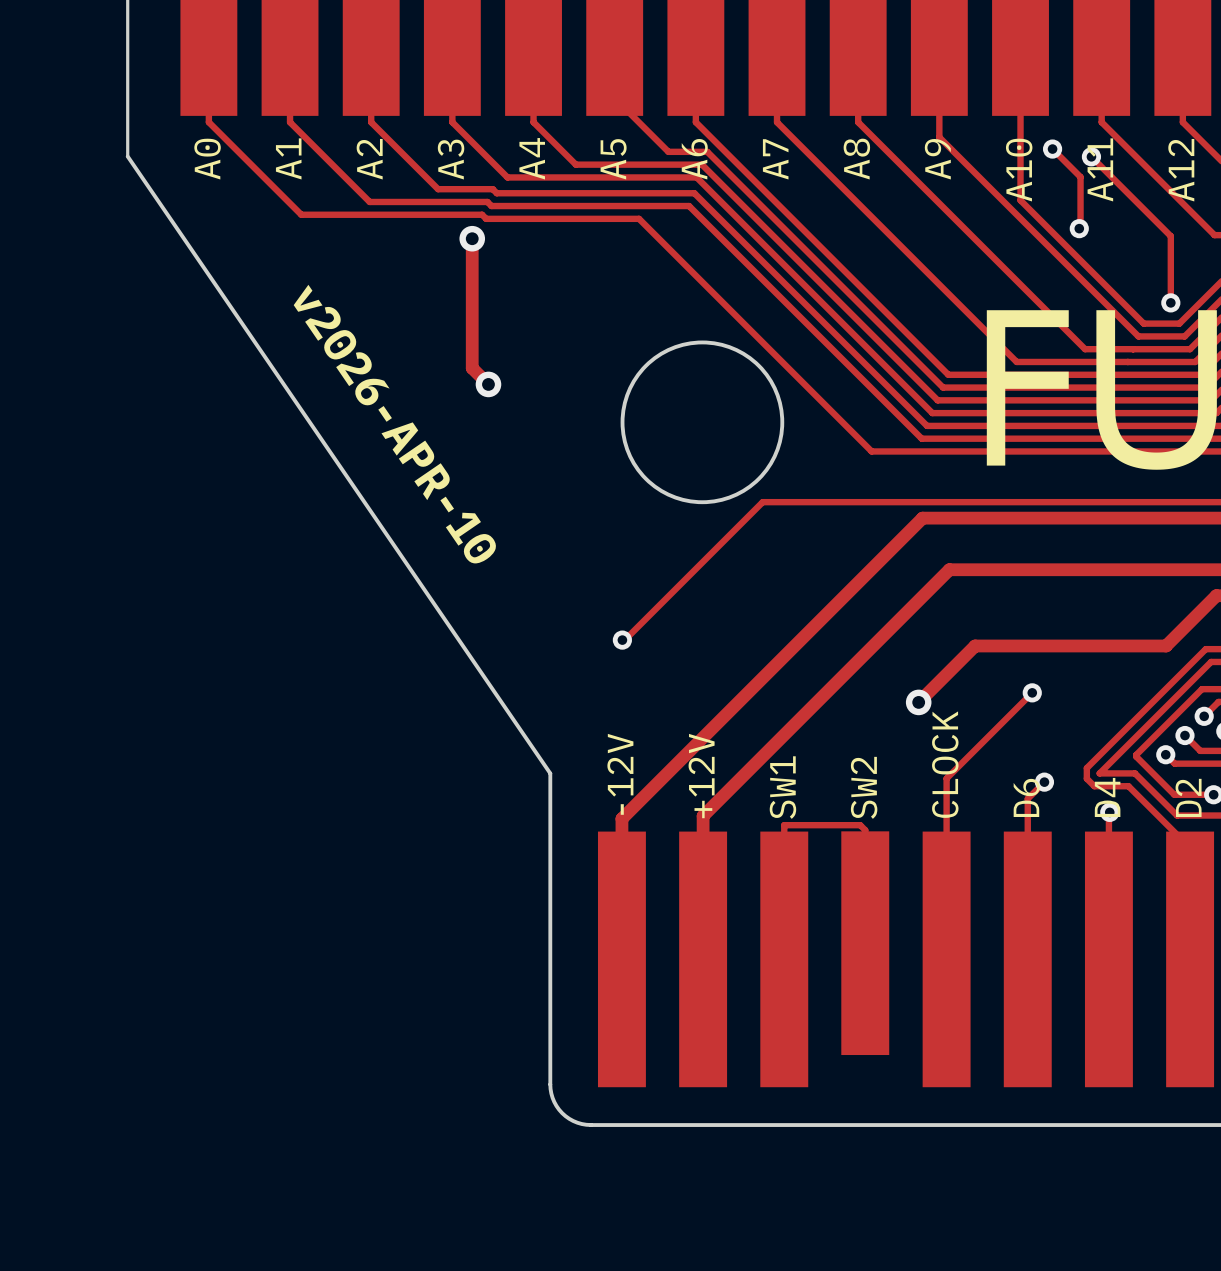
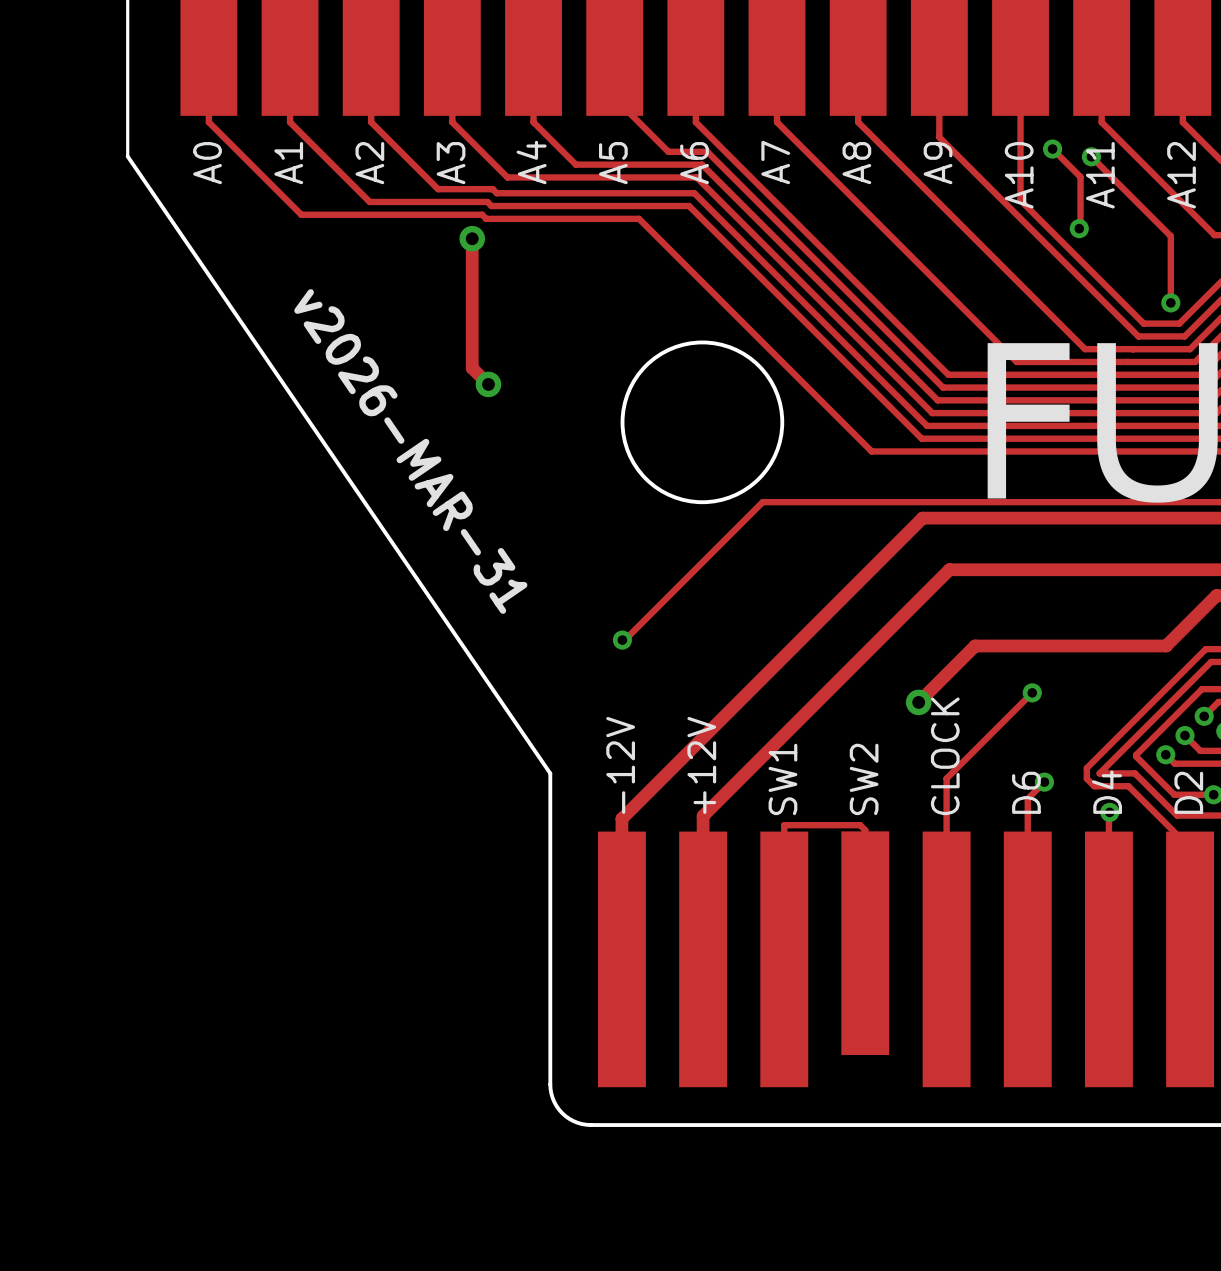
drawing position: (1027, 387) -> (1028, 420)
drawing position: (1156, 389) -> (1157, 422)
text: v2026-APR-10 (395, 424) -> v2026-MAR-31 (410, 451)

